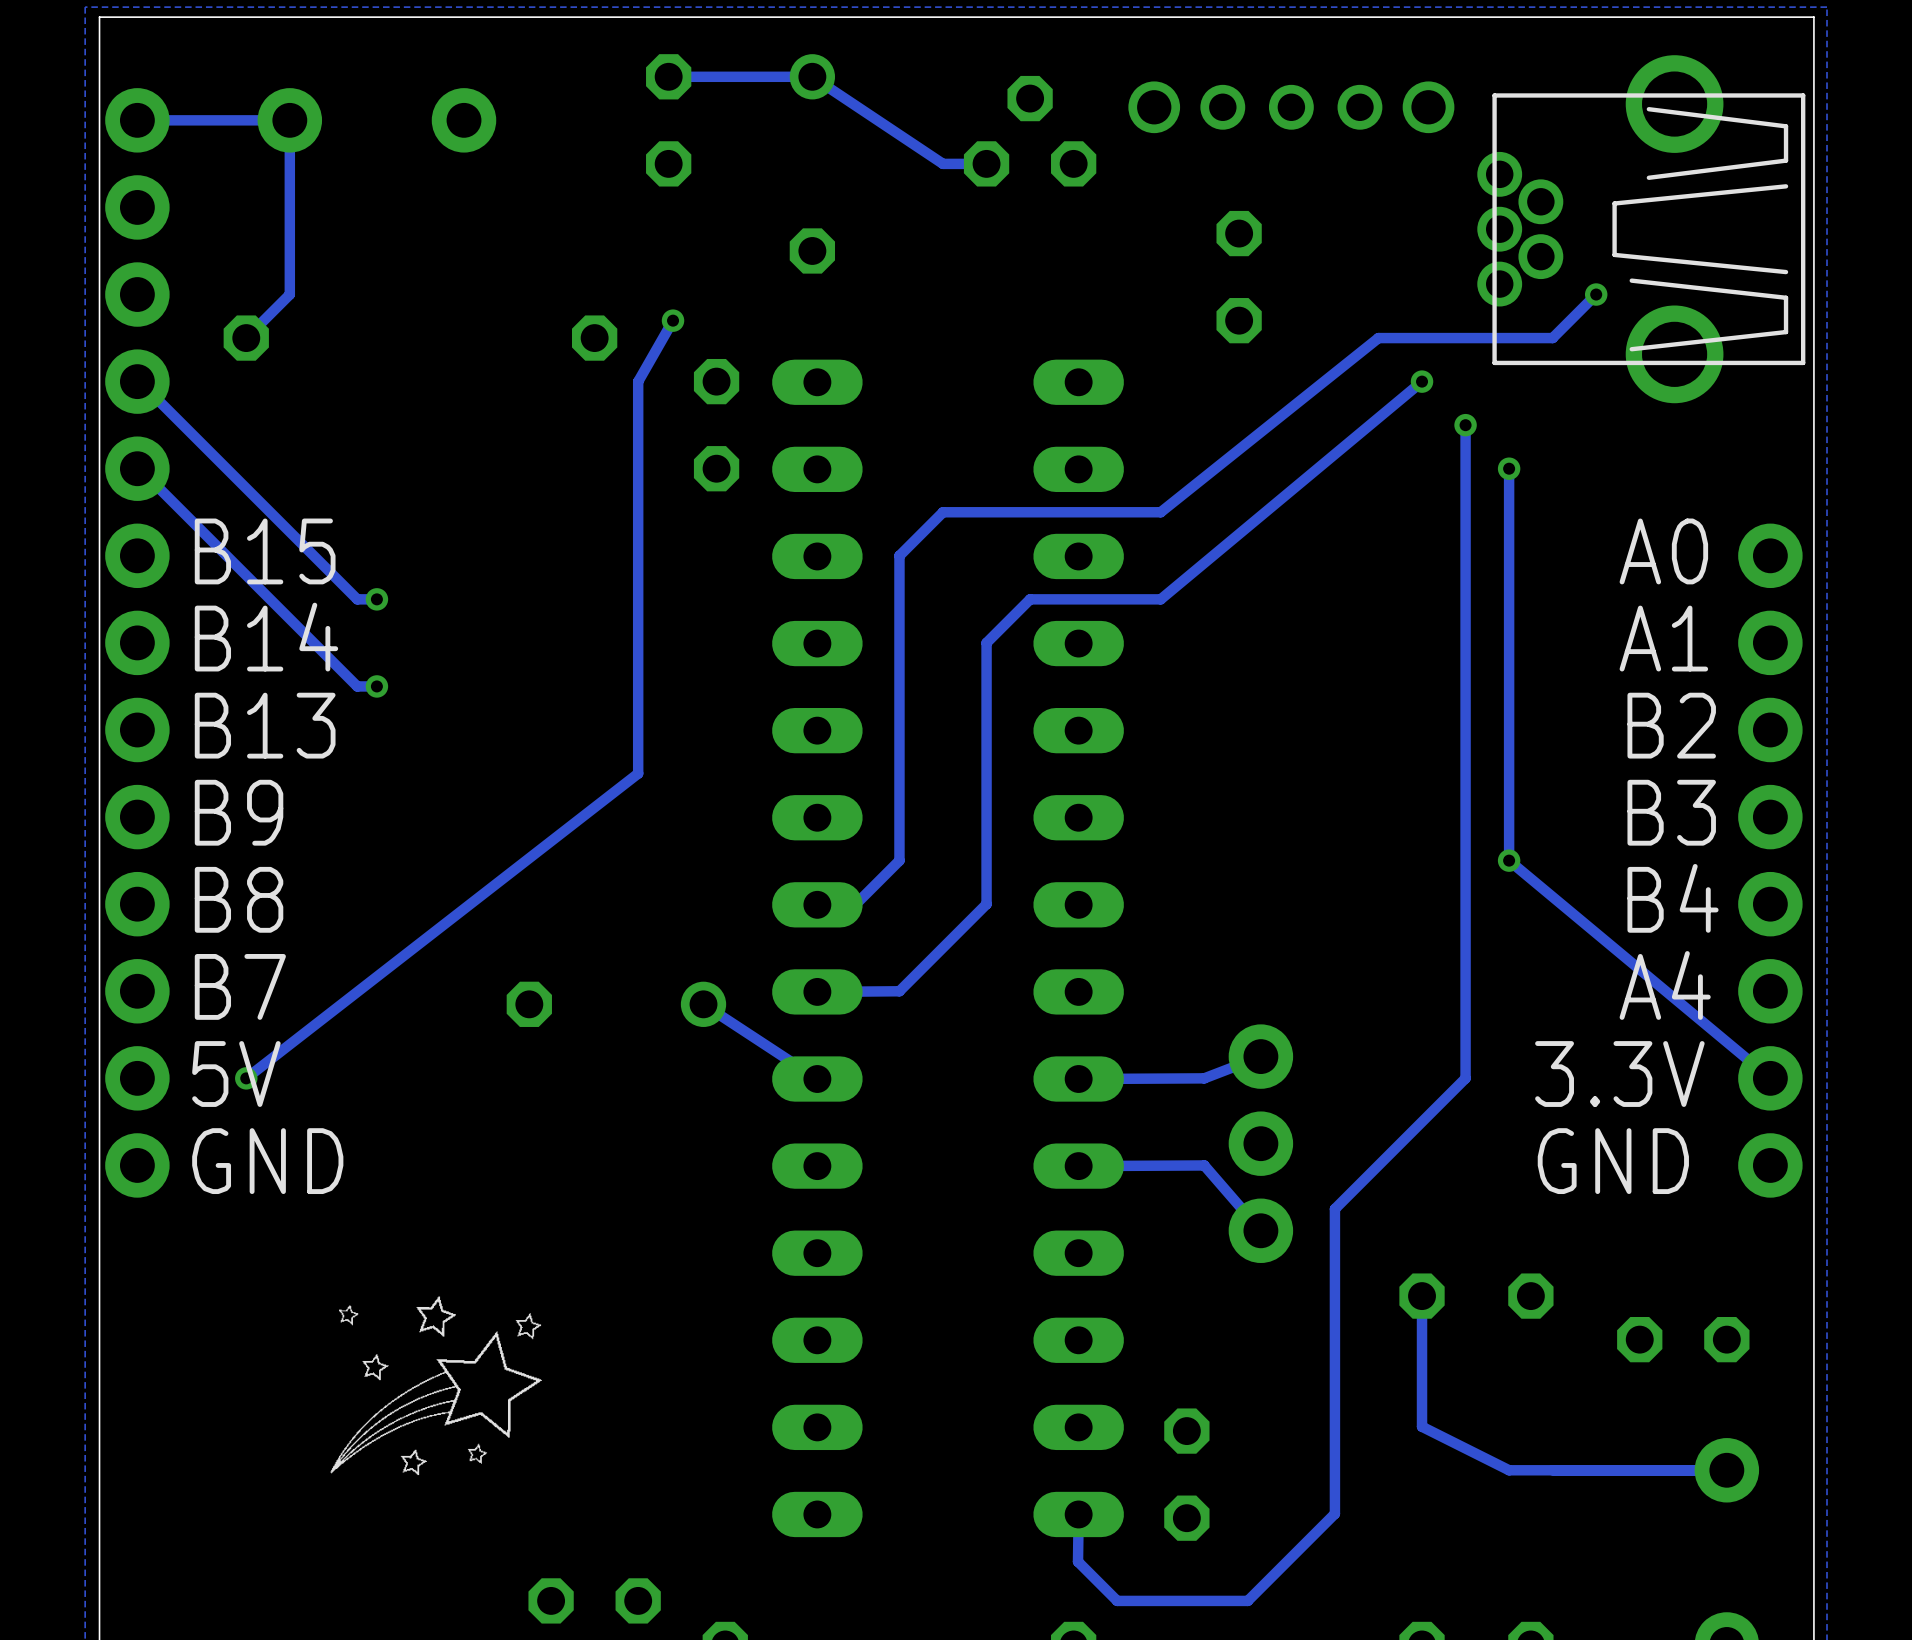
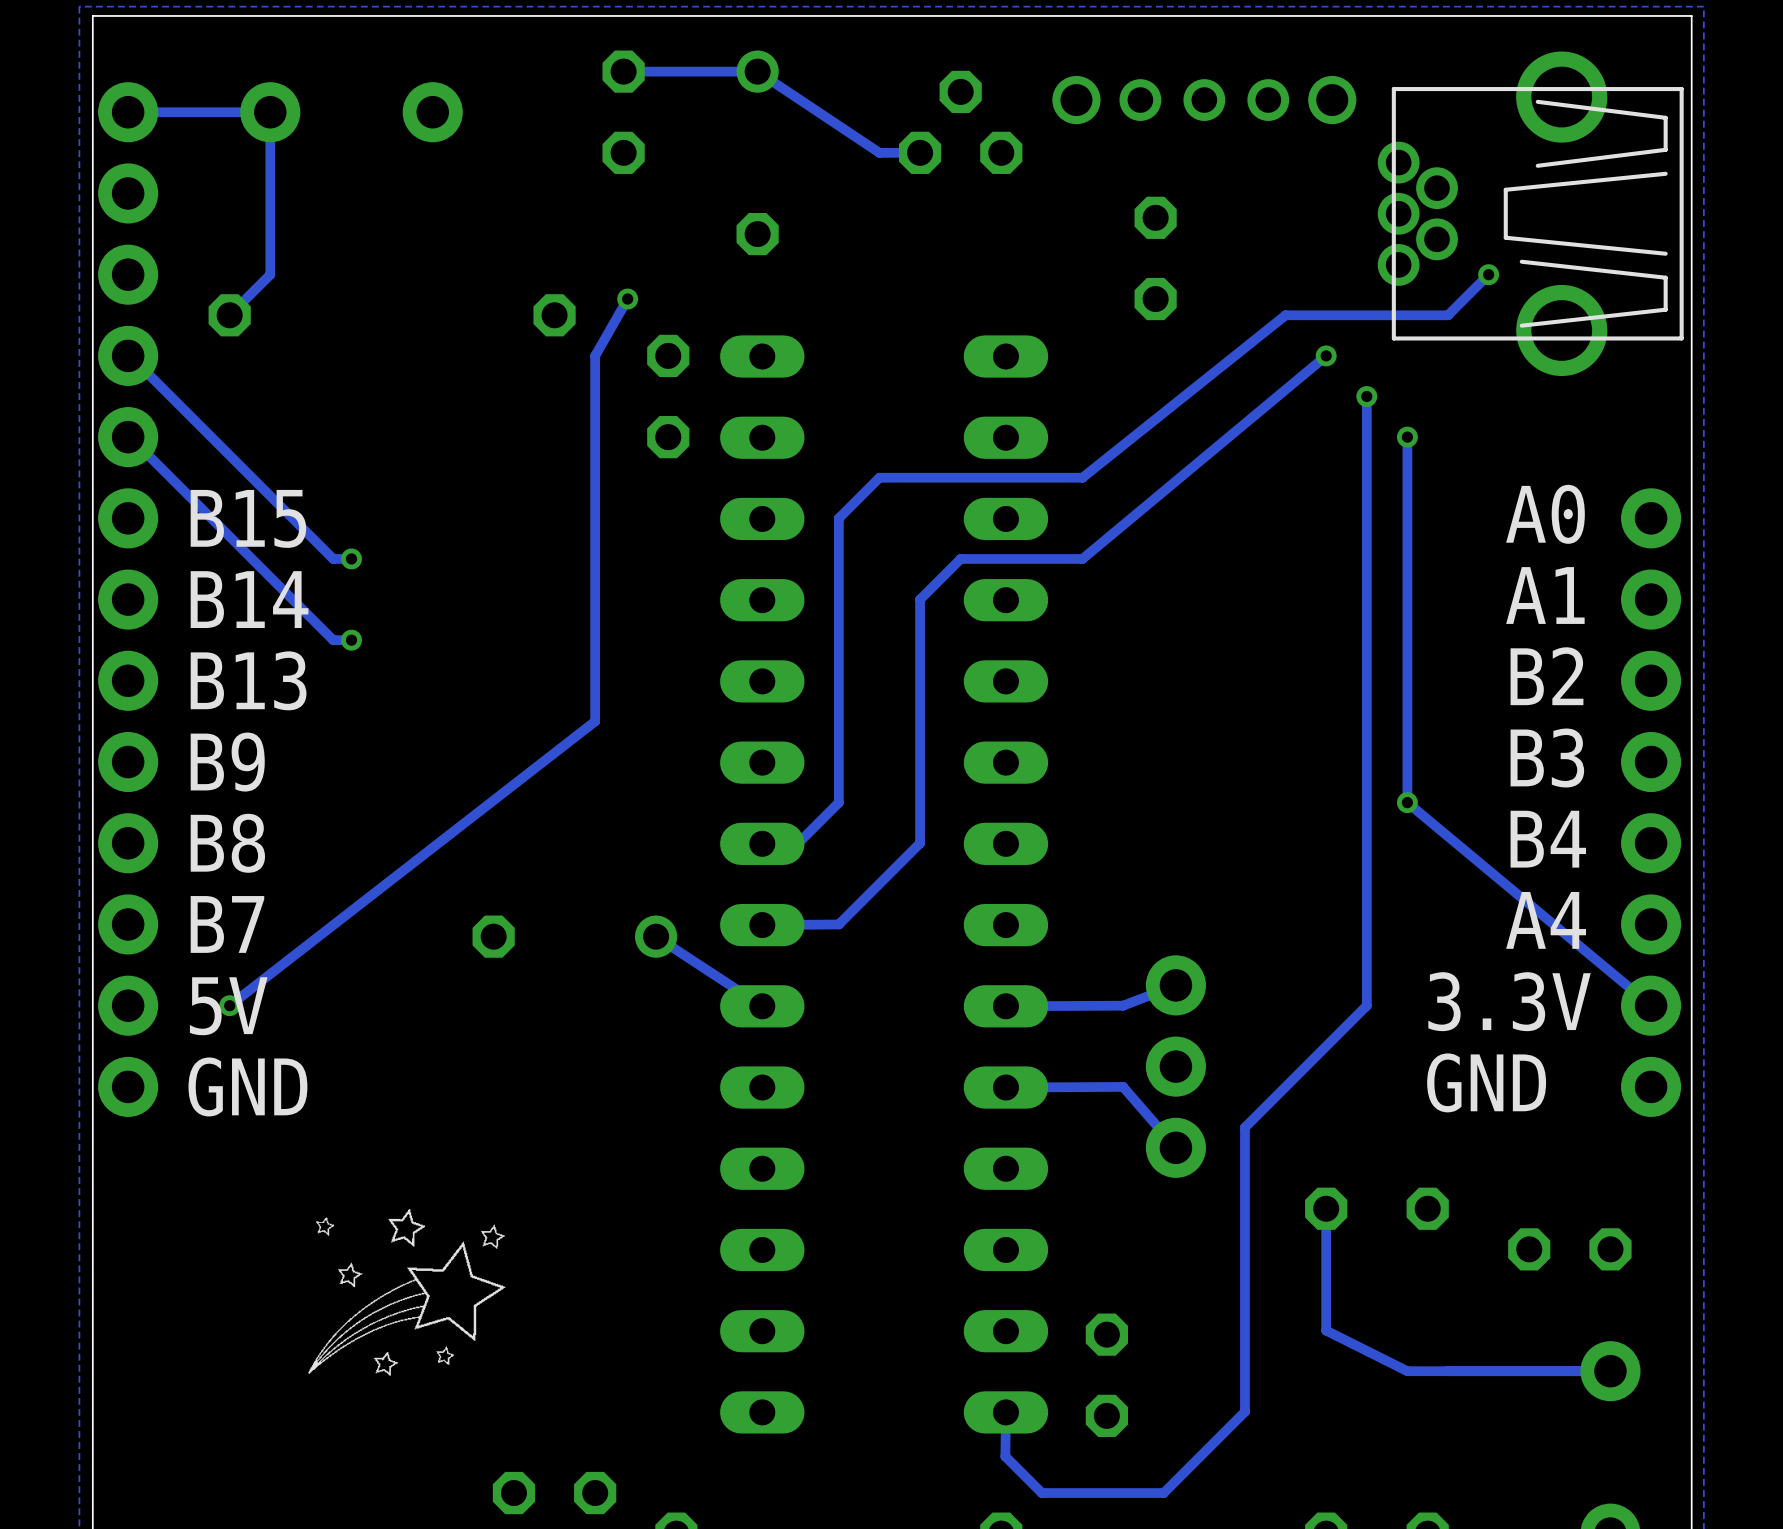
text position: B15 (265, 551) -> B15 (248, 518)
text position: B14 (266, 637) -> B14 (249, 599)
text position: B13 (265, 725) -> B13 (248, 680)
text position: B9 (239, 812) -> B9 (227, 762)
text position: B8 (239, 899) -> B8 (227, 843)
text position: B7 (240, 986) -> B7 (227, 924)
text position: 5V (236, 1074) -> 5V (228, 1006)
text position: GND (267, 1161) -> GND (247, 1086)

